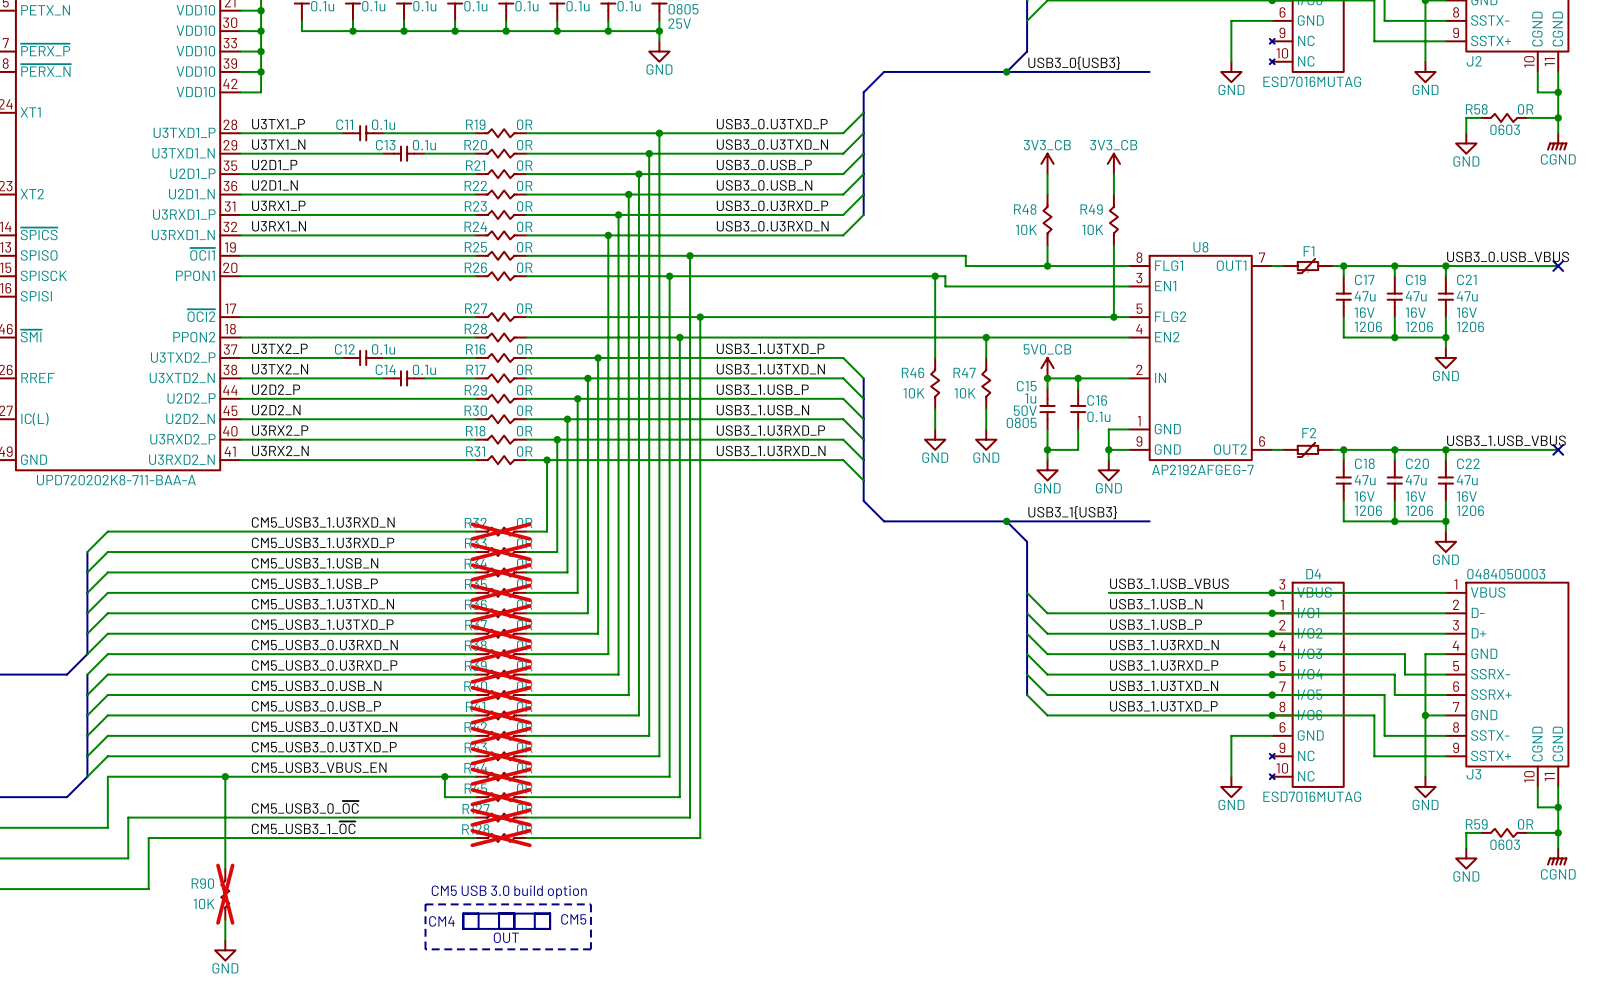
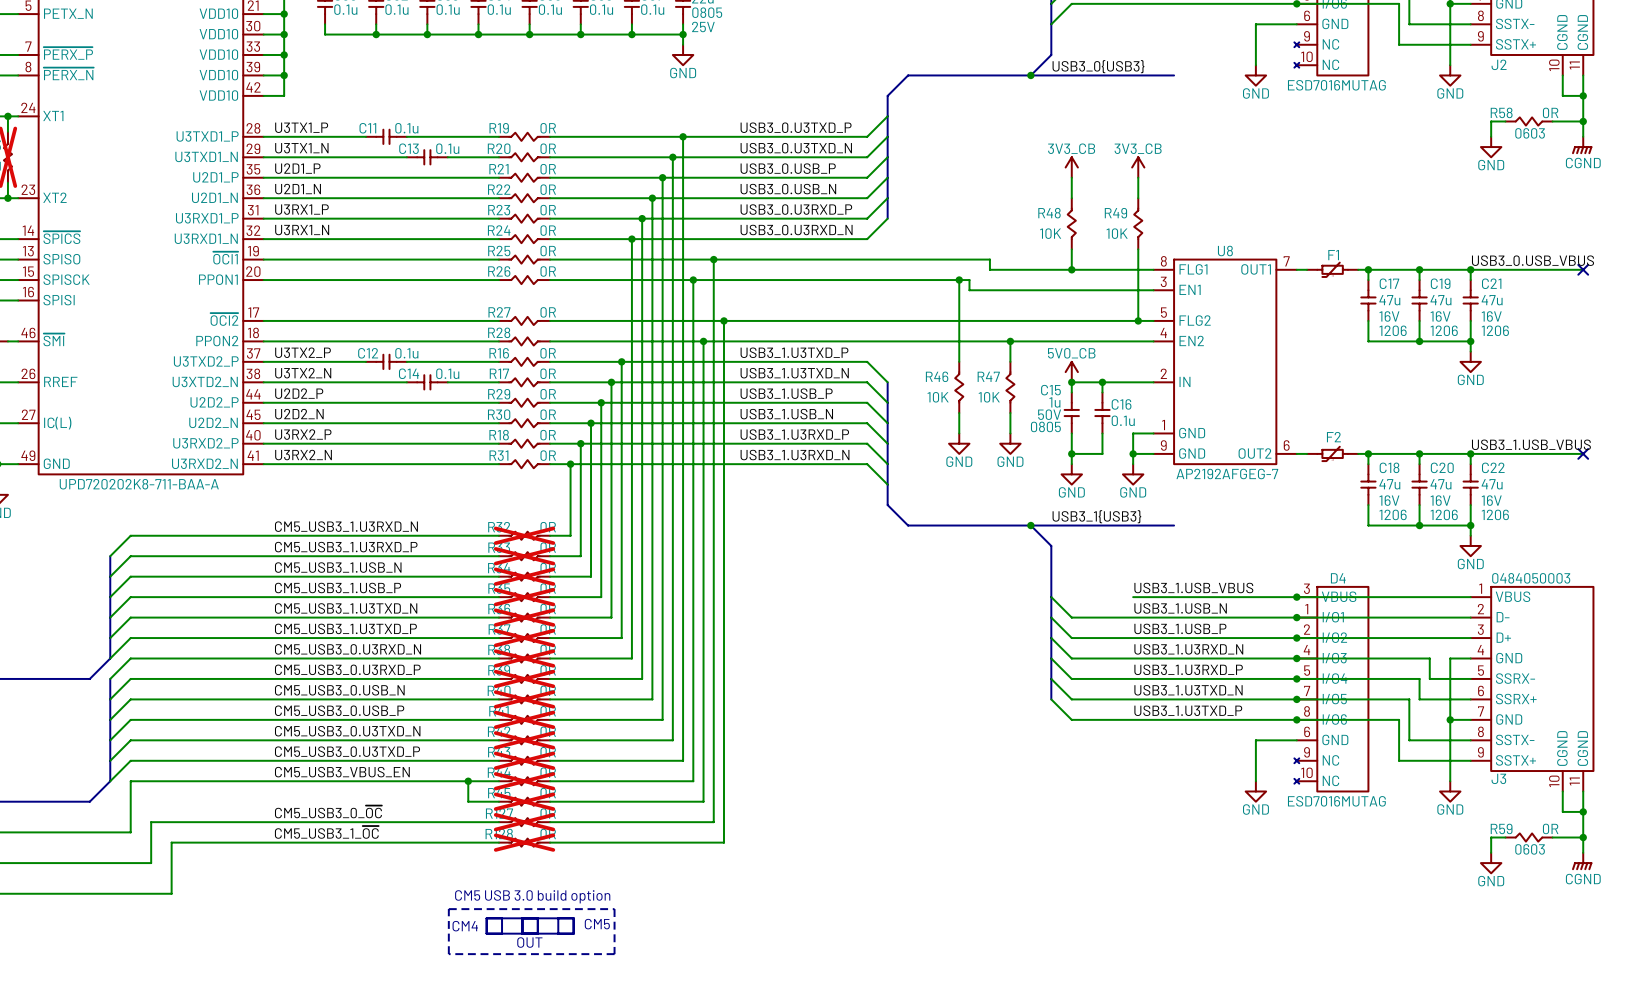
wire: (225, 776) (225, 868) -> none
junction: (225, 776) -> none
R90: 10K (225, 894) -> none
wire: (225, 919) (225, 940) -> none
power symbol: GND (225, 950) -> none

